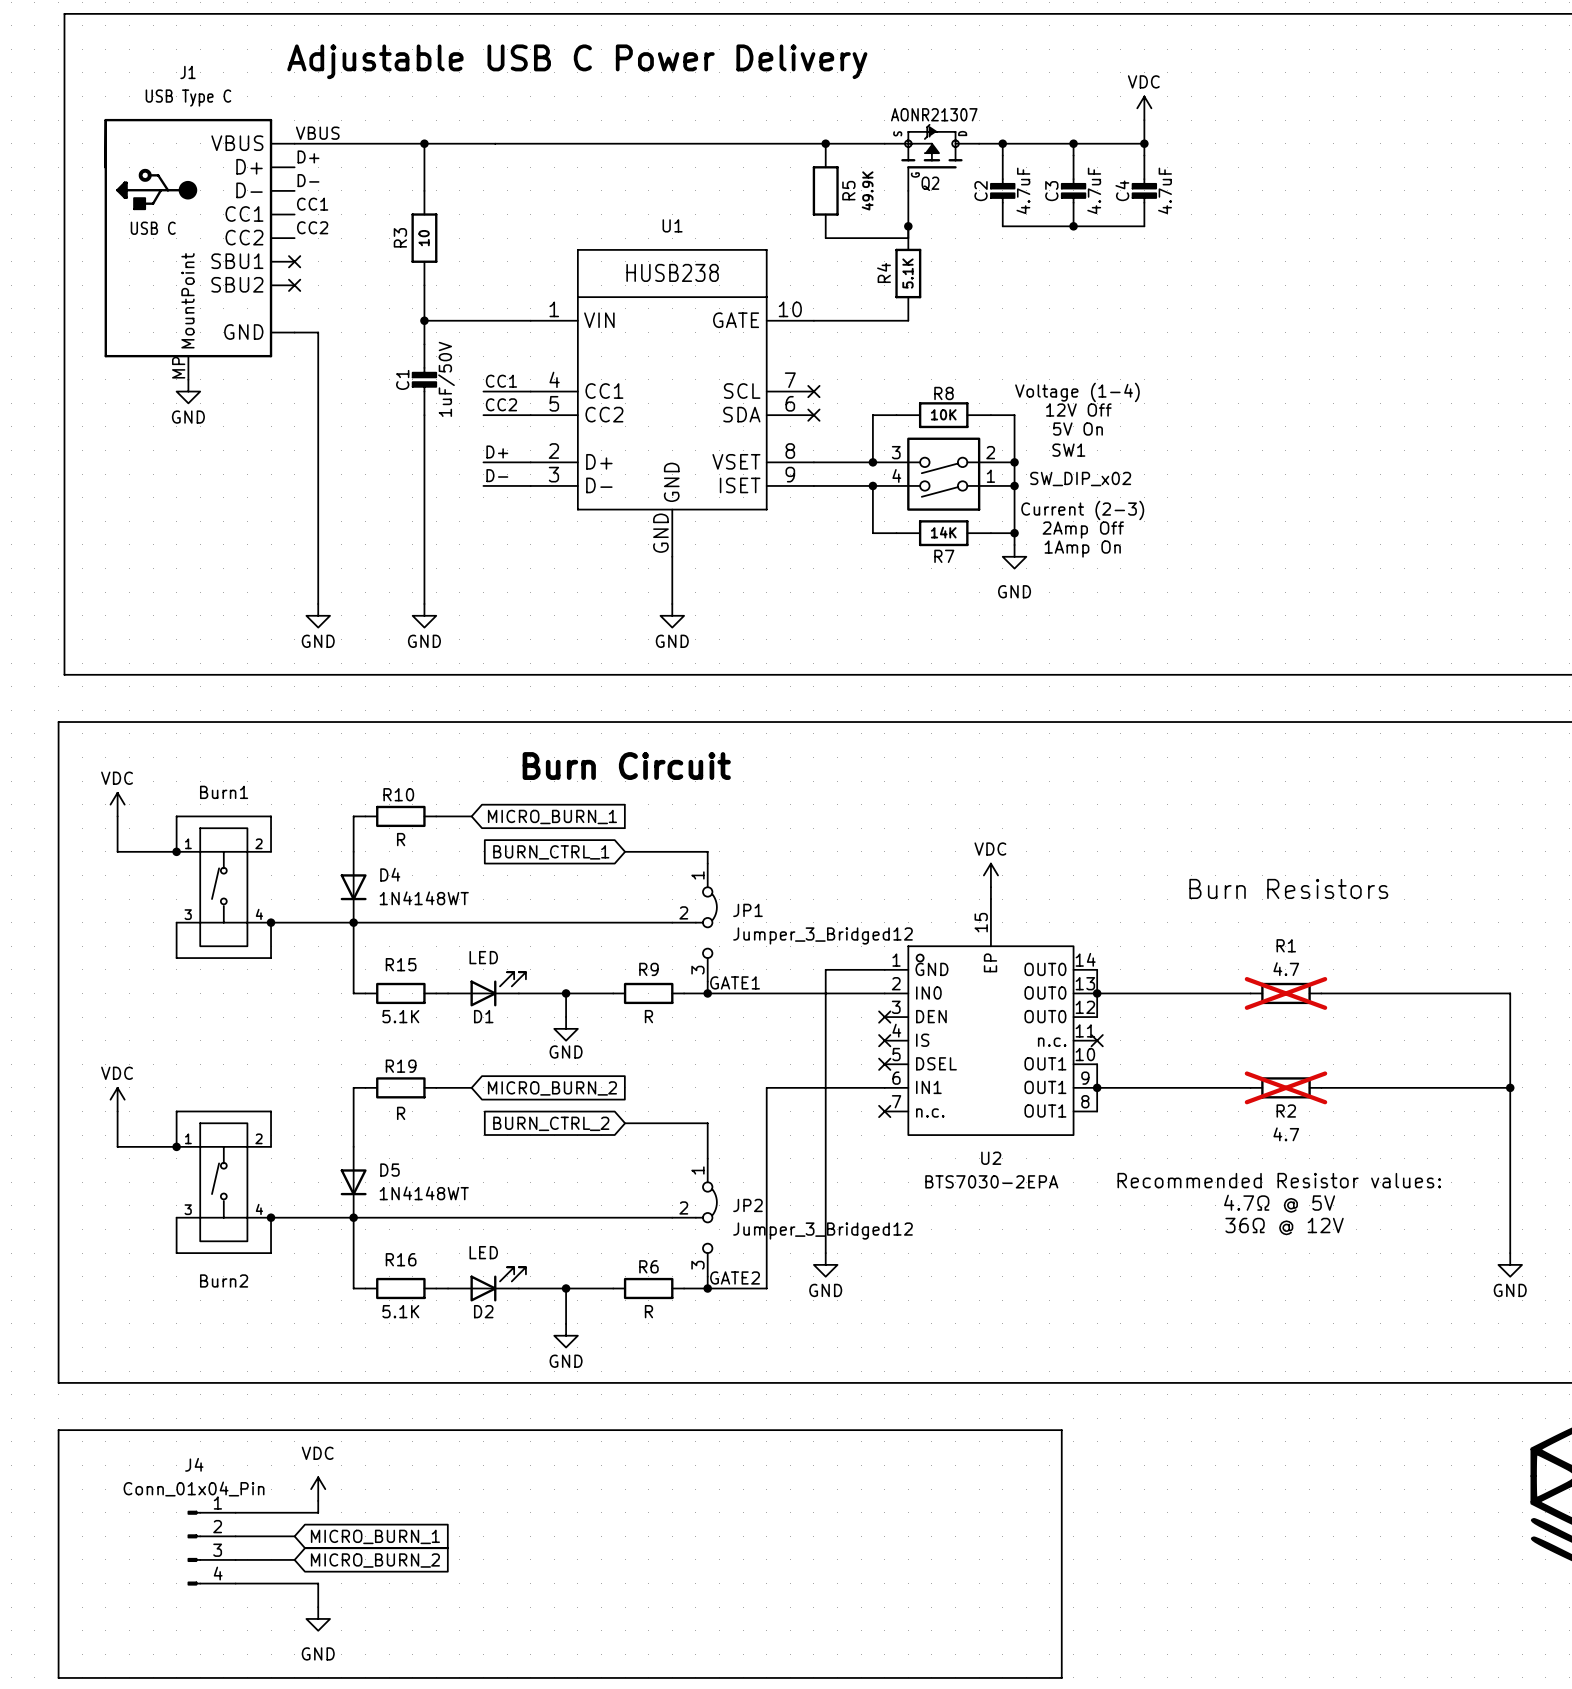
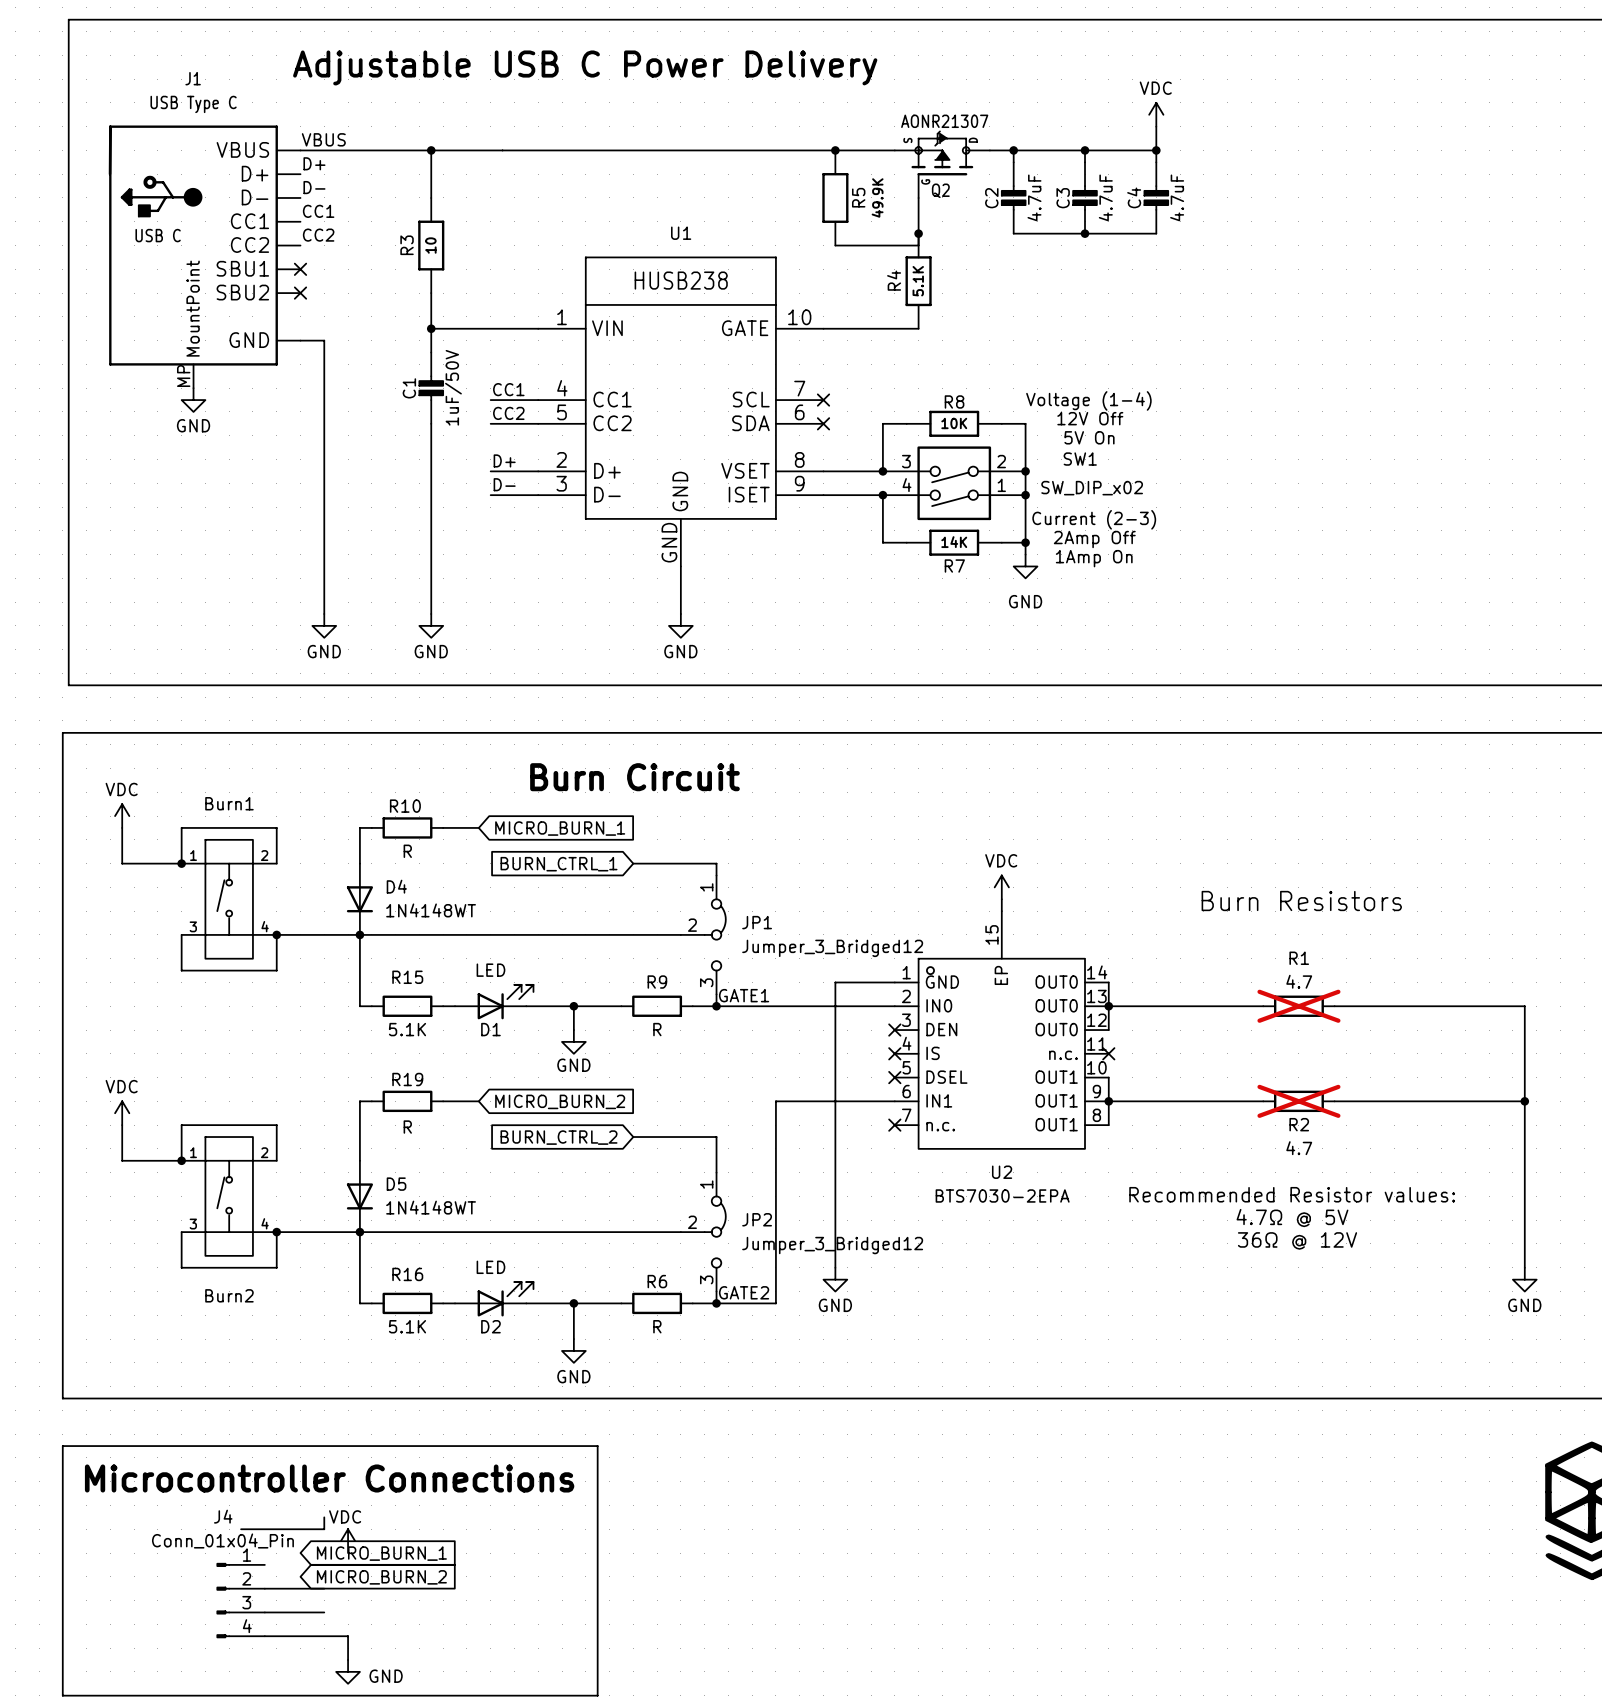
line: (589, 1430) (1061, 1430) (1061, 1677) (589, 1677) -> (597, 1446) (597, 1695)
power symbol text position: VDC (317, 1453) -> VDC (345, 1516)
text: none -> Microcontroller Connections (329, 1478)
power symbol position: VDC (318, 1489) -> VDC (348, 1541)
wire: (235, 1536) (294, 1536) -> (264, 1588) (324, 1588)
J4 position: (211, 1548) -> (240, 1600)
wire: (235, 1559) (294, 1559) -> (264, 1612) (324, 1612)
wire: (235, 1583) (318, 1583) (318, 1607) -> (264, 1636) (348, 1636) (348, 1660)
power symbol position: GND (318, 1618) -> GND (348, 1671)
power symbol text position: GND (318, 1653) -> GND (386, 1676)

